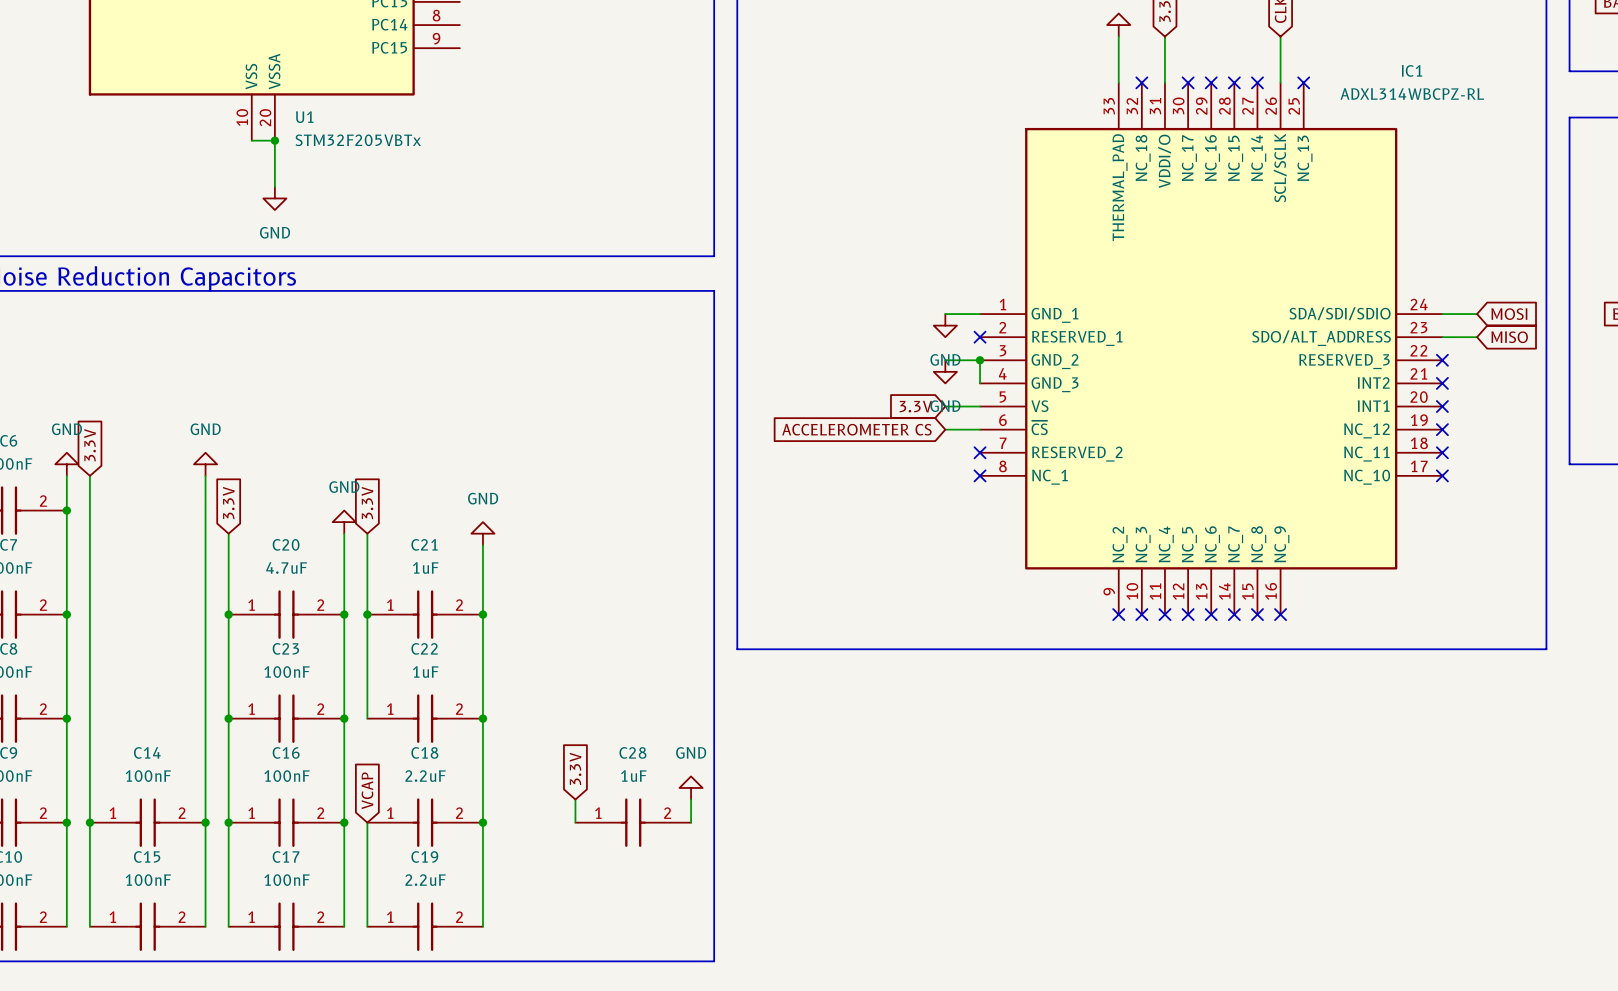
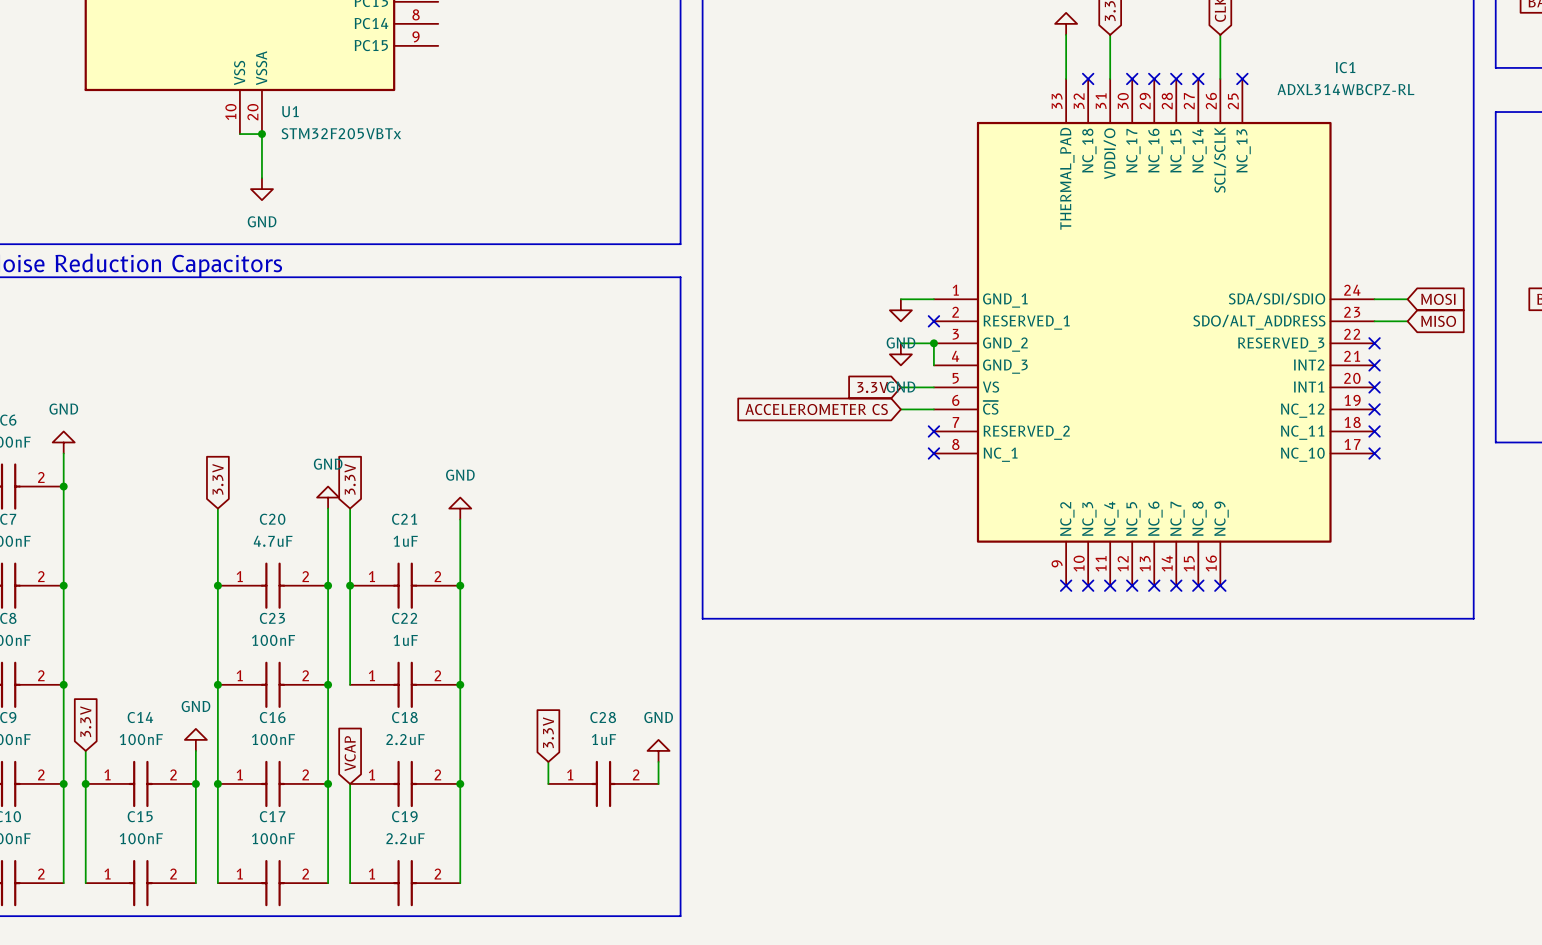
global label: 3.3V (90, 445) -> none
power symbol: GND (205, 464) -> none
wire: (89, 475) (89, 787) -> none
wire: (205, 475) (205, 787) -> none
global label: none -> 3.3V (85, 721)
power symbol: none -> GND (195, 739)

